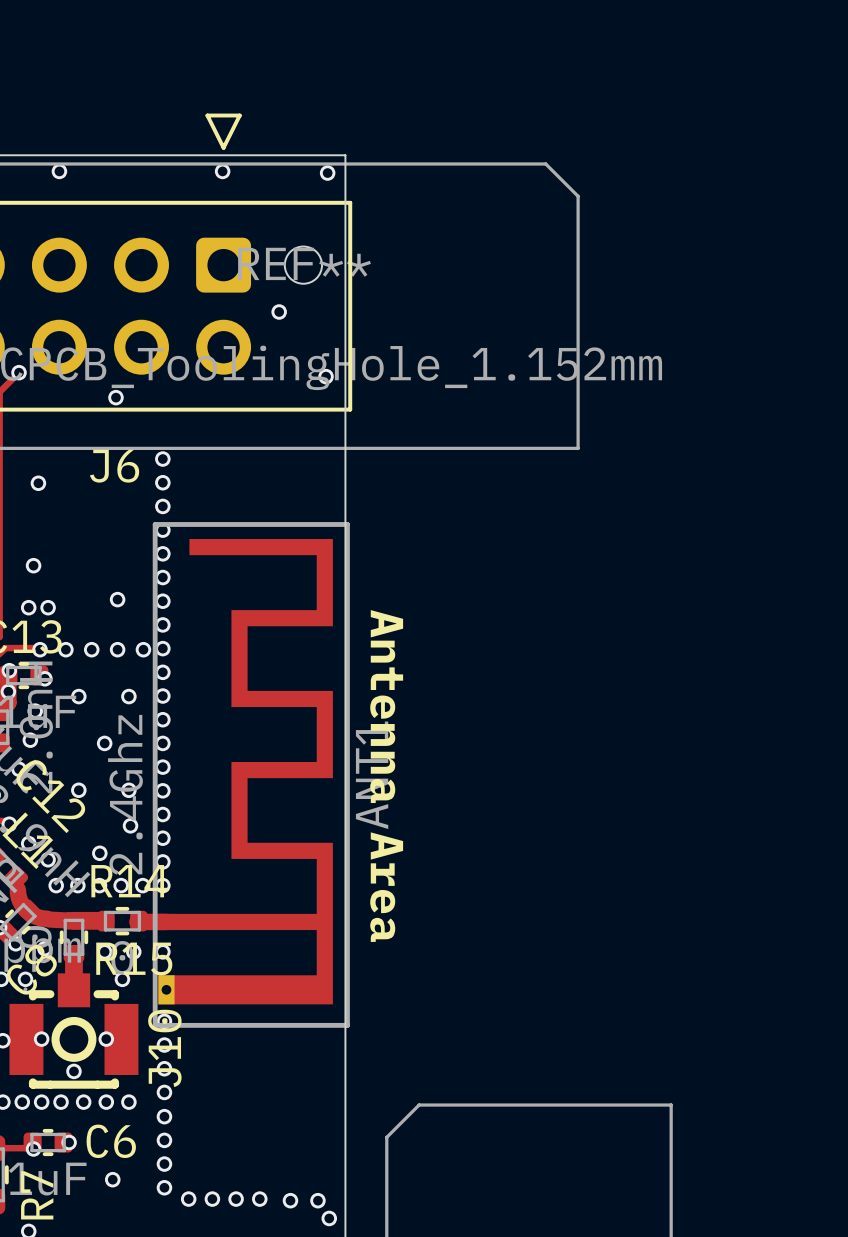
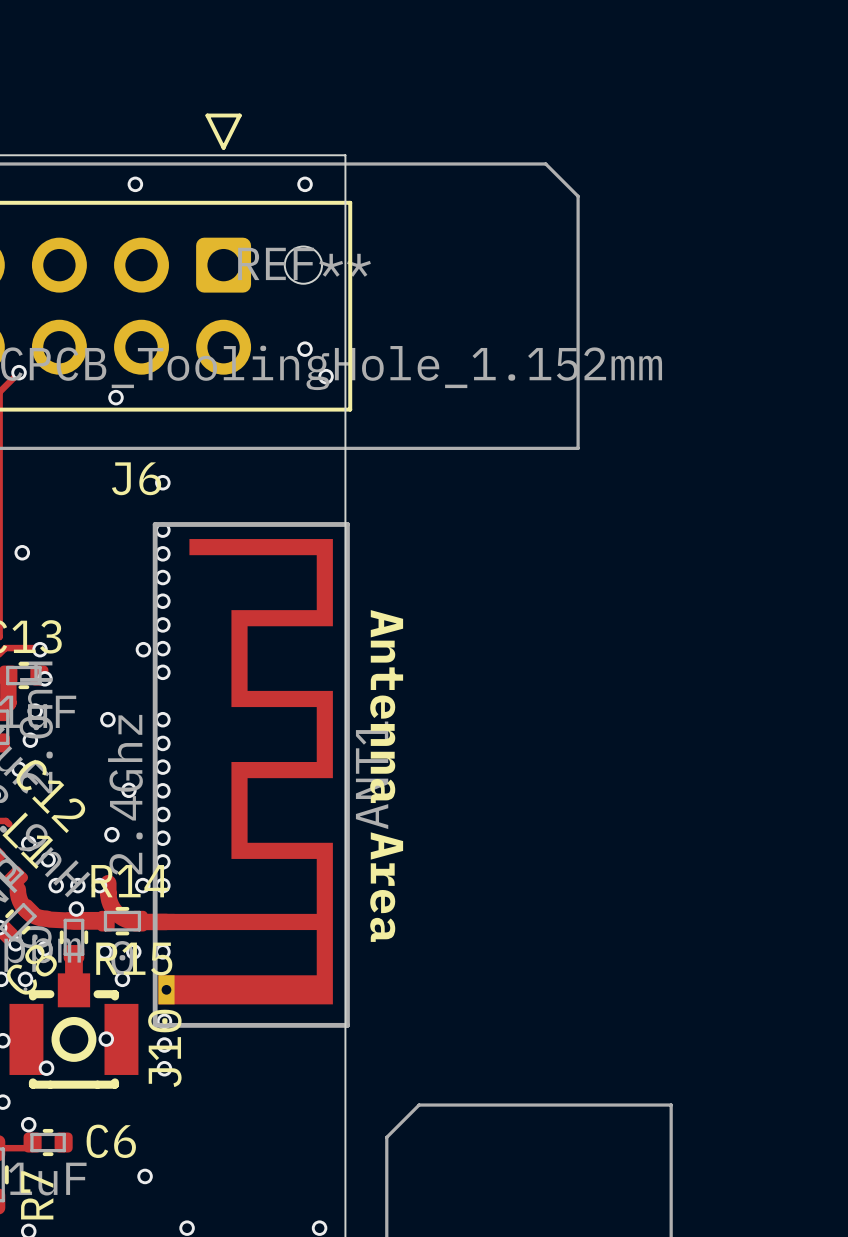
via: (59, 171) -> none
via: (222, 171) -> none
via position: (327, 173) -> (305, 184)
via: none -> (135, 184)
via position: (279, 311) -> (305, 349)
via: (162, 459) -> none
J6 name position: J6 (114, 466) -> J6 (136, 478)
via: (38, 483) -> none
via: (162, 506) -> none
via position: (33, 565) -> (22, 552)
via: (117, 599) -> none
via: (28, 607) -> none
via: (48, 607) -> none
via: (65, 649) -> none
via: (91, 649) -> none
via: (117, 649) -> none
via: (9, 670) -> none
via: (8, 691) -> none
via: (78, 696) -> none
via: (128, 696) -> none
via: (162, 696) -> none
via: none -> (107, 719)
via: (104, 743) -> none
via: (78, 790) -> none
via: (9, 824) -> none
via: (130, 825) -> none
via: none -> (111, 834)
via: (99, 853) -> none
track: none -> (108, 883) (109, 900) (114, 910) (122, 918) (137, 921)
via: (121, 885) -> none
via: none -> (76, 909)
via: (41, 1039) -> none
via: none -> (46, 1068)
via: (73, 1071) -> none
via: (164, 1092) -> none
via: (22, 1102) -> none
via: (41, 1102) -> none
via: (61, 1102) -> none
via: (83, 1102) -> none
via: (106, 1102) -> none
via: (128, 1102) -> none
via: (164, 1116) -> none
via: none -> (28, 1124)
via: (164, 1140) -> none
via: (69, 1142) -> none
via: (33, 1148) -> none
via: (164, 1164) -> none
via: none -> (145, 1176)
via: (112, 1179) -> none
via: (164, 1187) -> none
via: (188, 1199) -> none
via: (212, 1199) -> none
via: (236, 1199) -> none
via: (259, 1199) -> none
via: (290, 1200) -> none
via: (317, 1200) -> none
via position: (329, 1218) -> (319, 1228)
via: none -> (187, 1228)

